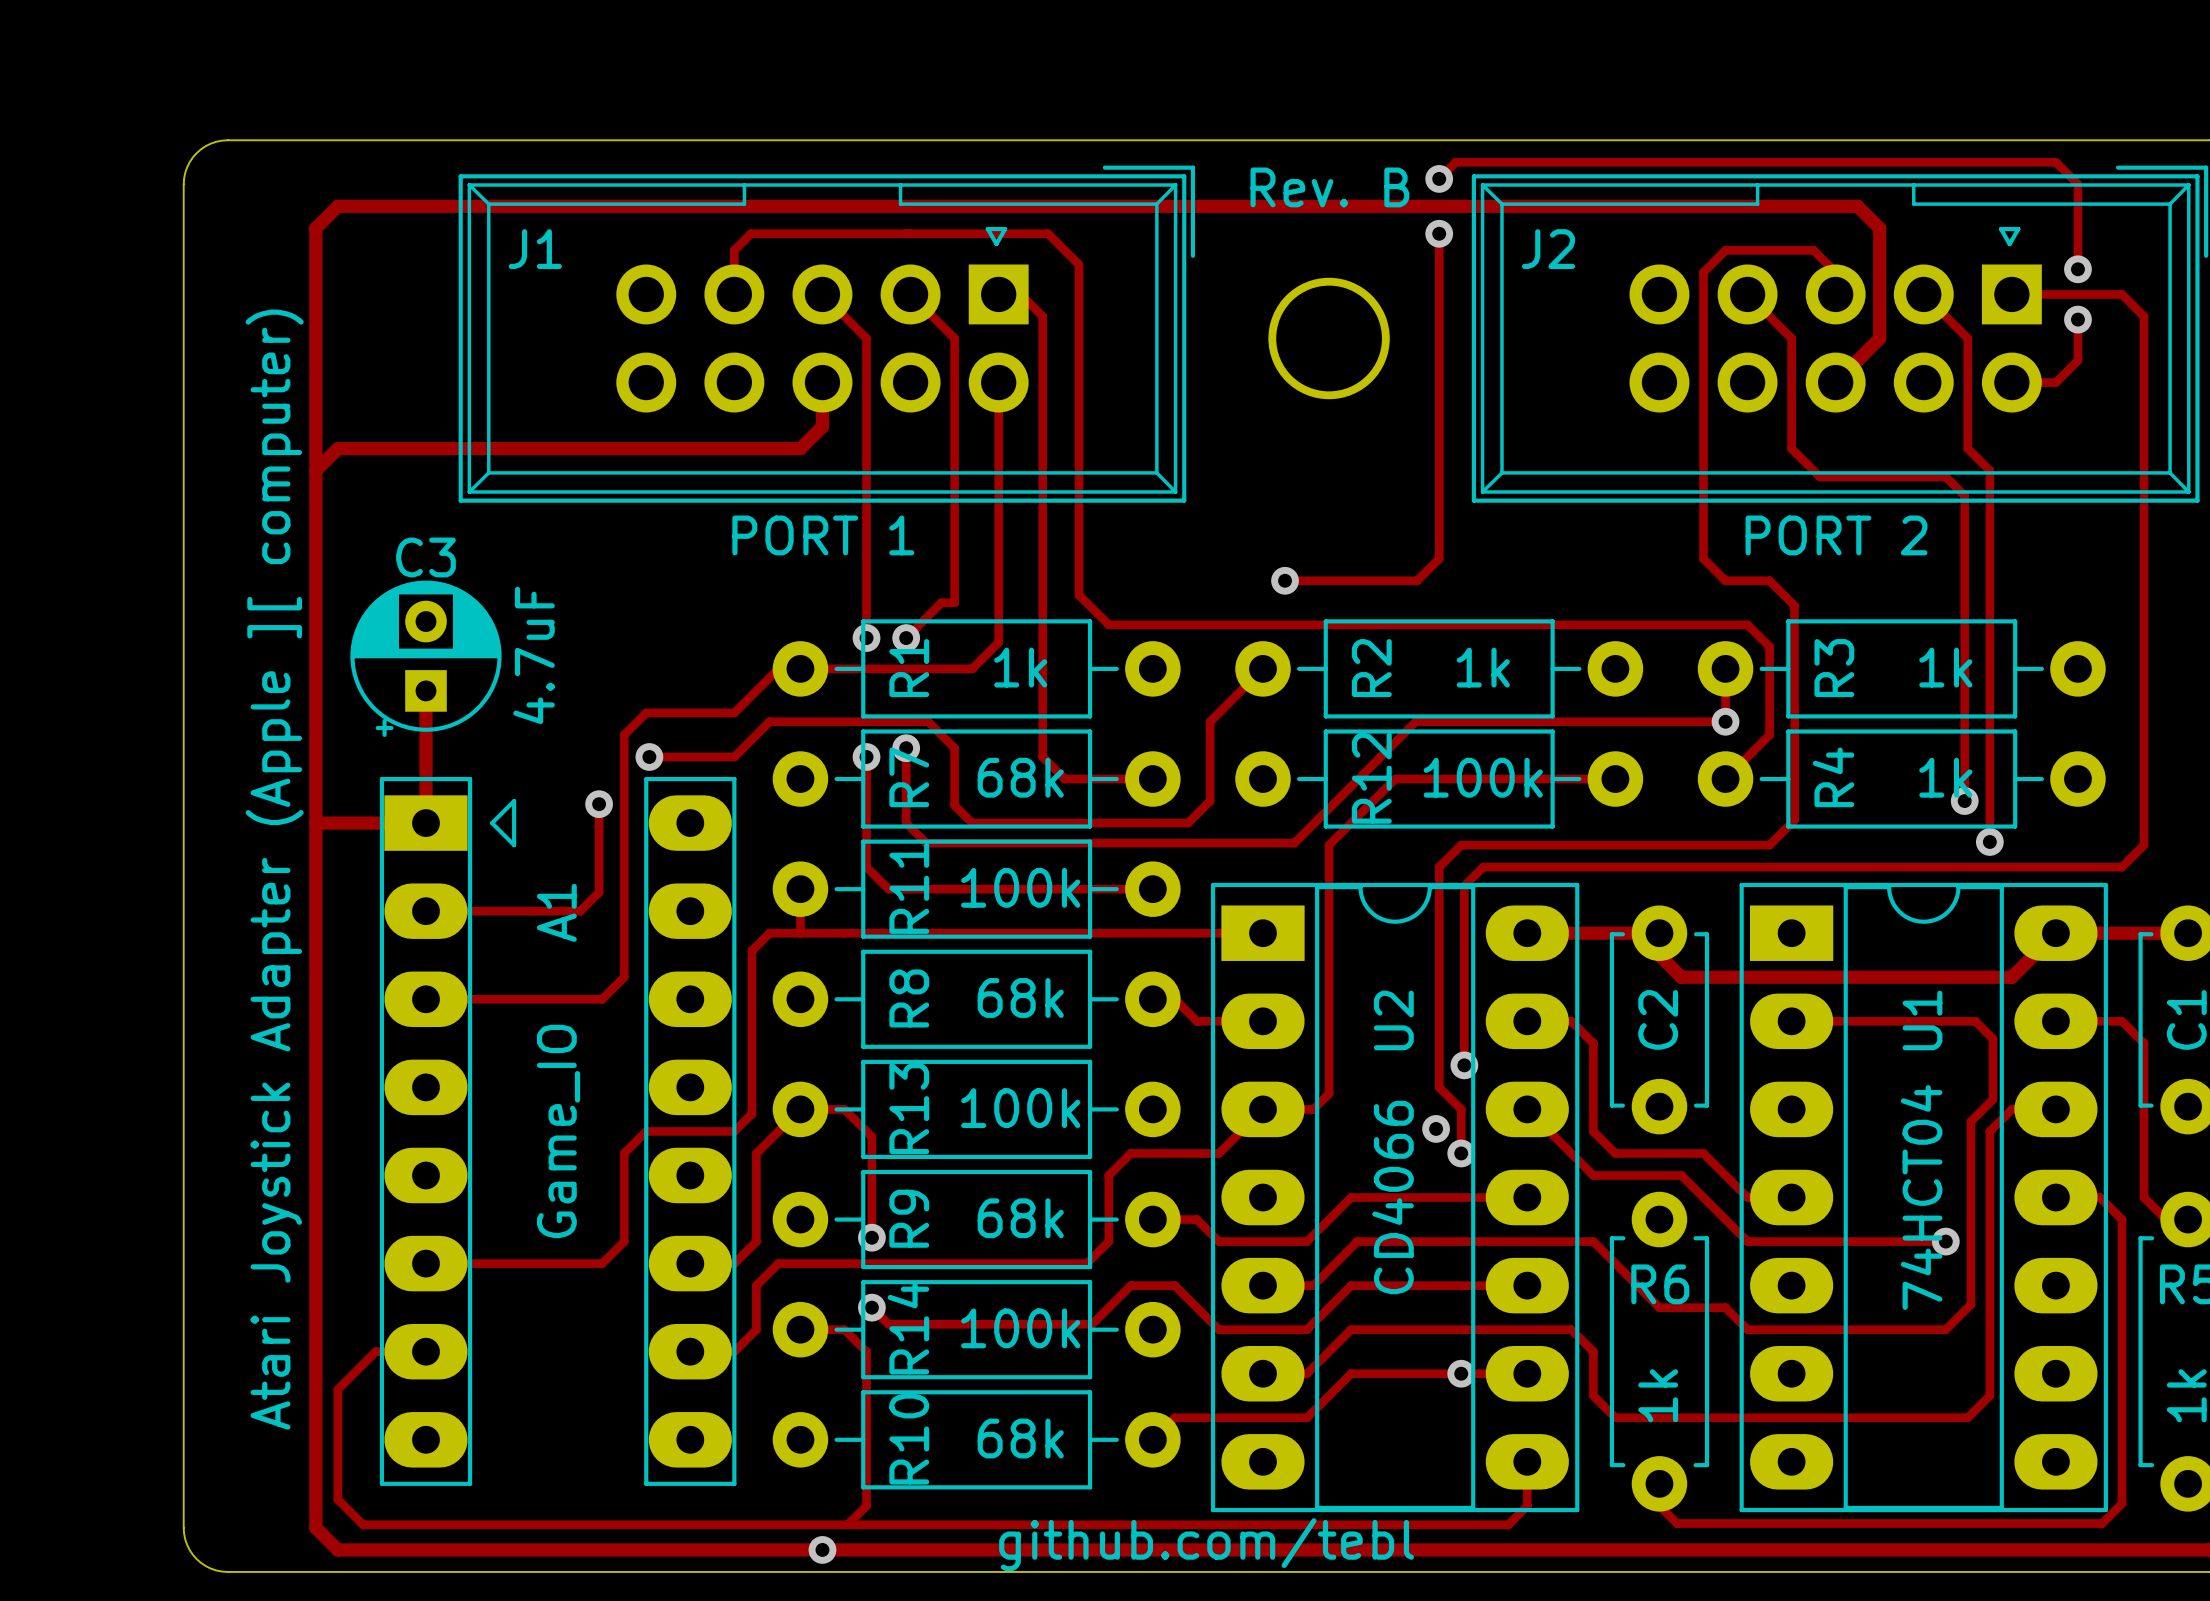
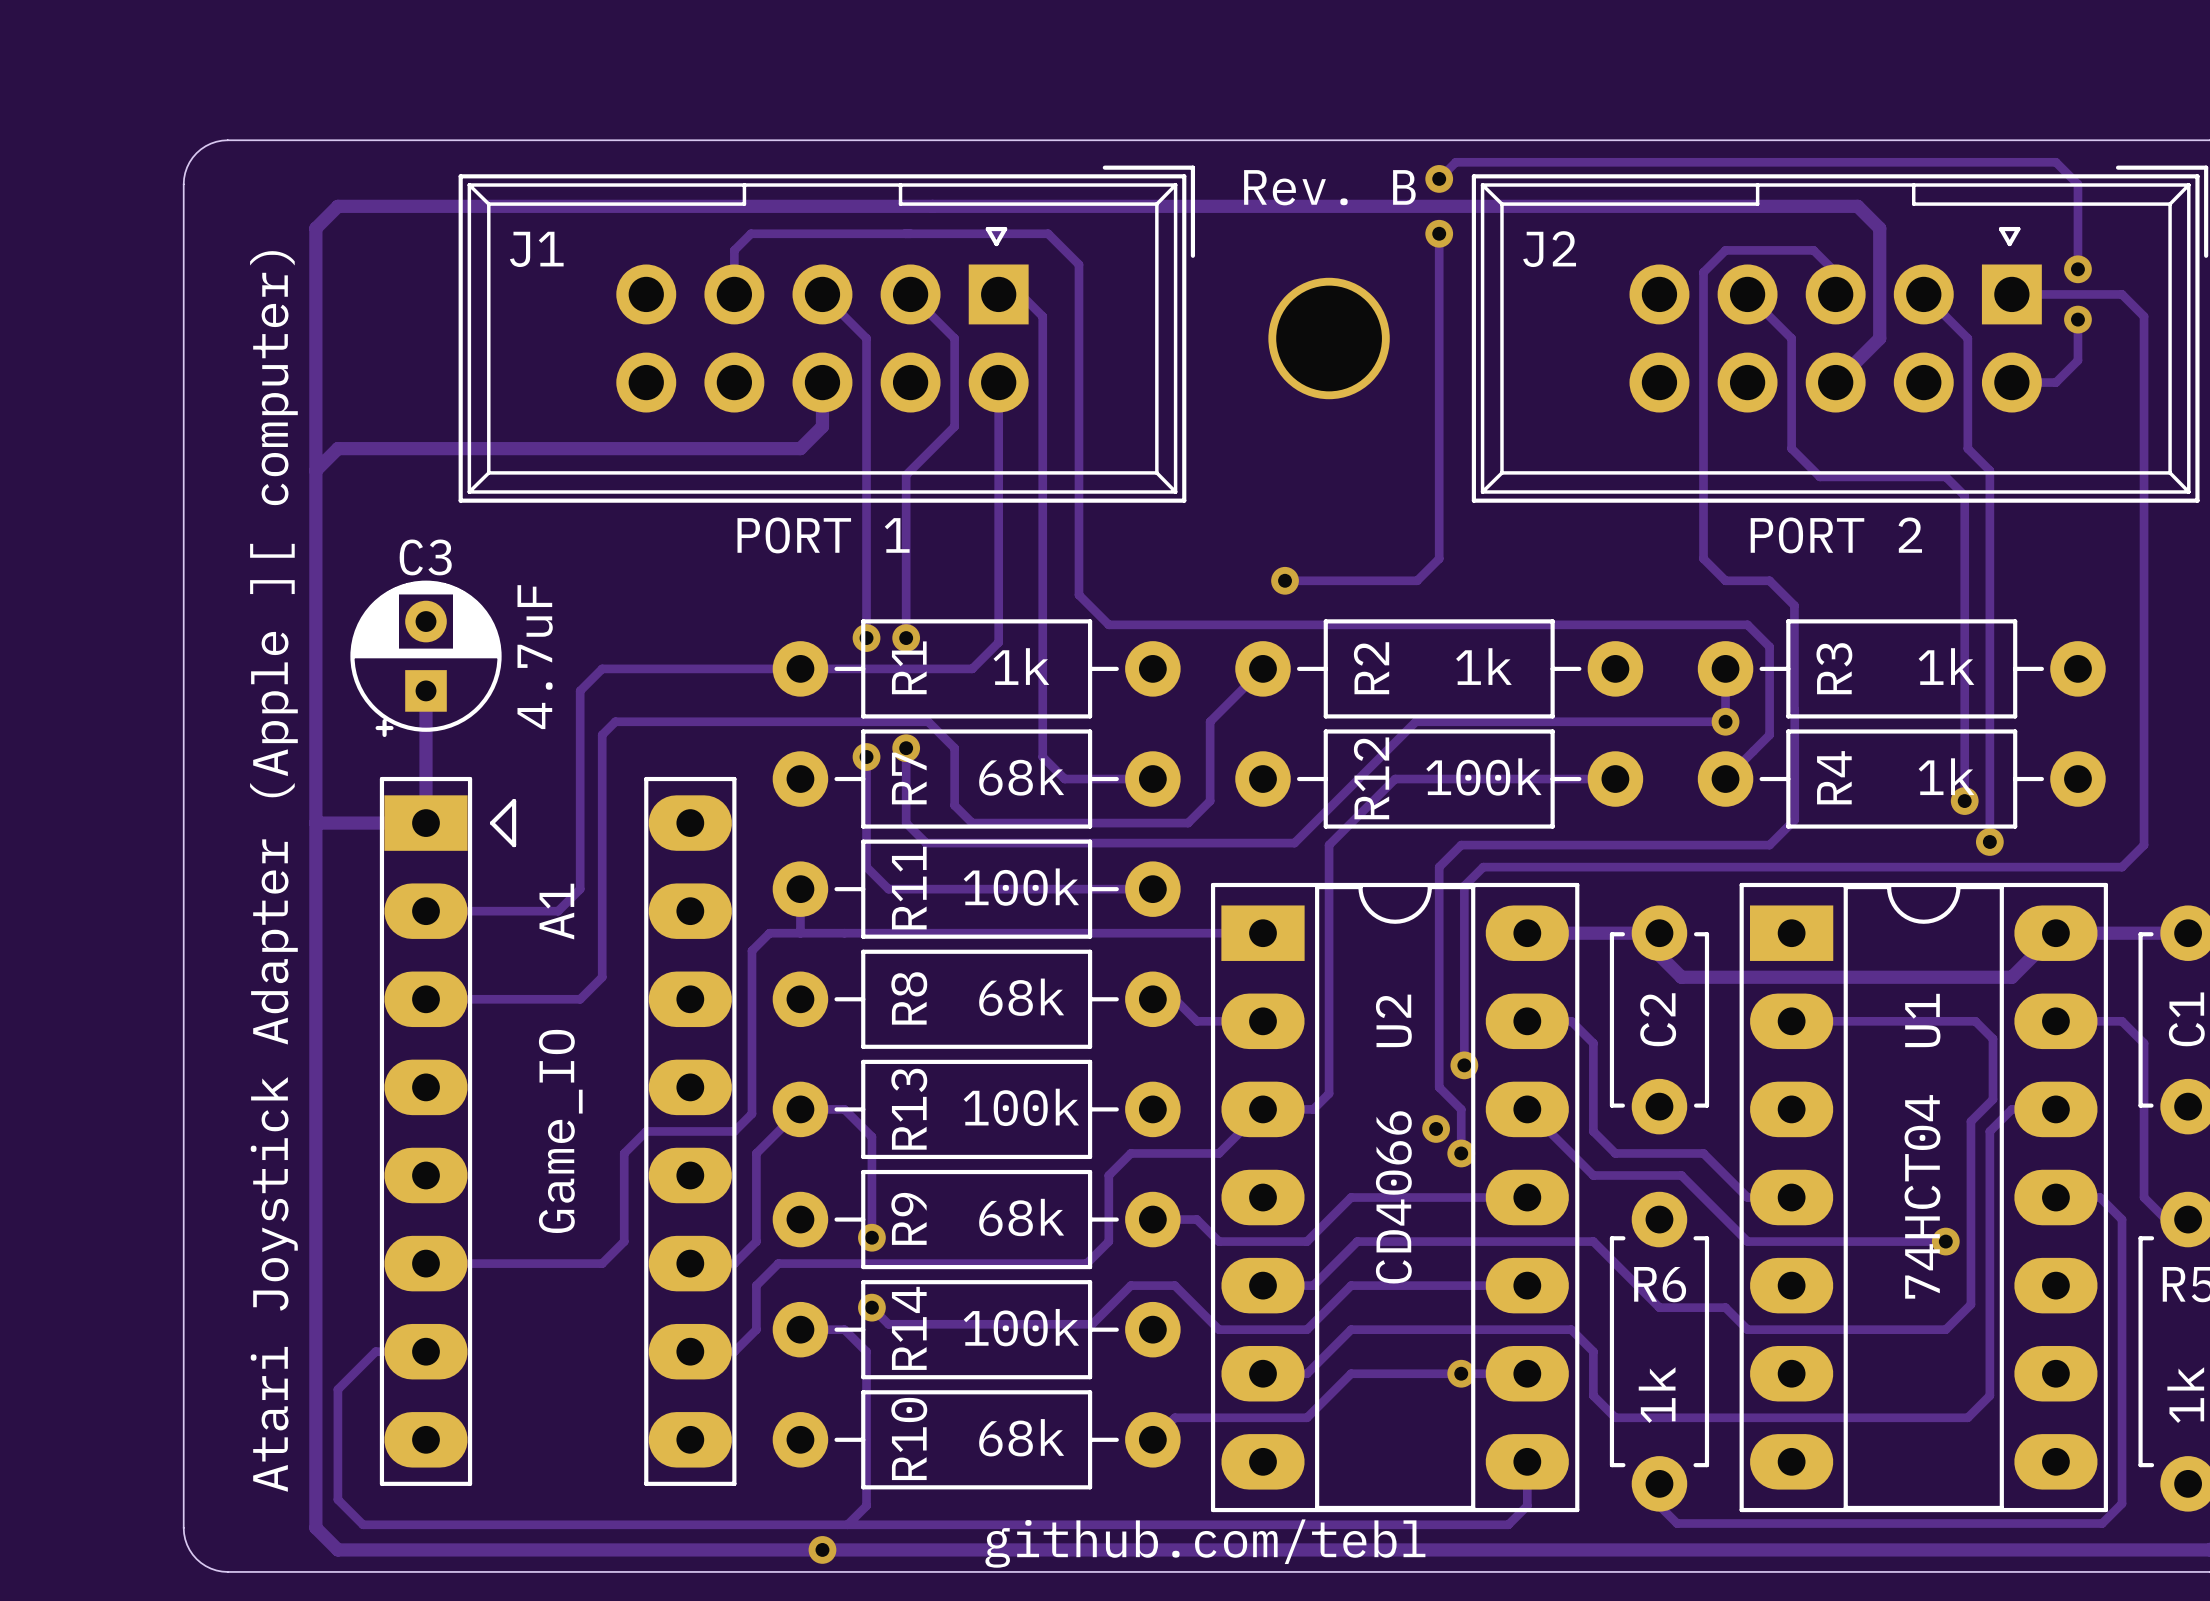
track: (954, 426) (954, 602) (941, 602) (906, 638) -> (954, 426) (906, 475) (906, 638)
track: (778, 668) (734, 712) (646, 712) (624, 734) (624, 977) (602, 999) (580, 999) -> (769, 721) (615, 721) (602, 734) (602, 977) (580, 999)
track: (769, 721) (734, 757) (649, 757) -> none
via: (649, 757) -> none
track: (599, 804) (599, 892) (580, 911) (558, 911) -> (778, 668) (602, 668) (580, 690) (580, 889) (558, 911)
via: (599, 804) -> none

